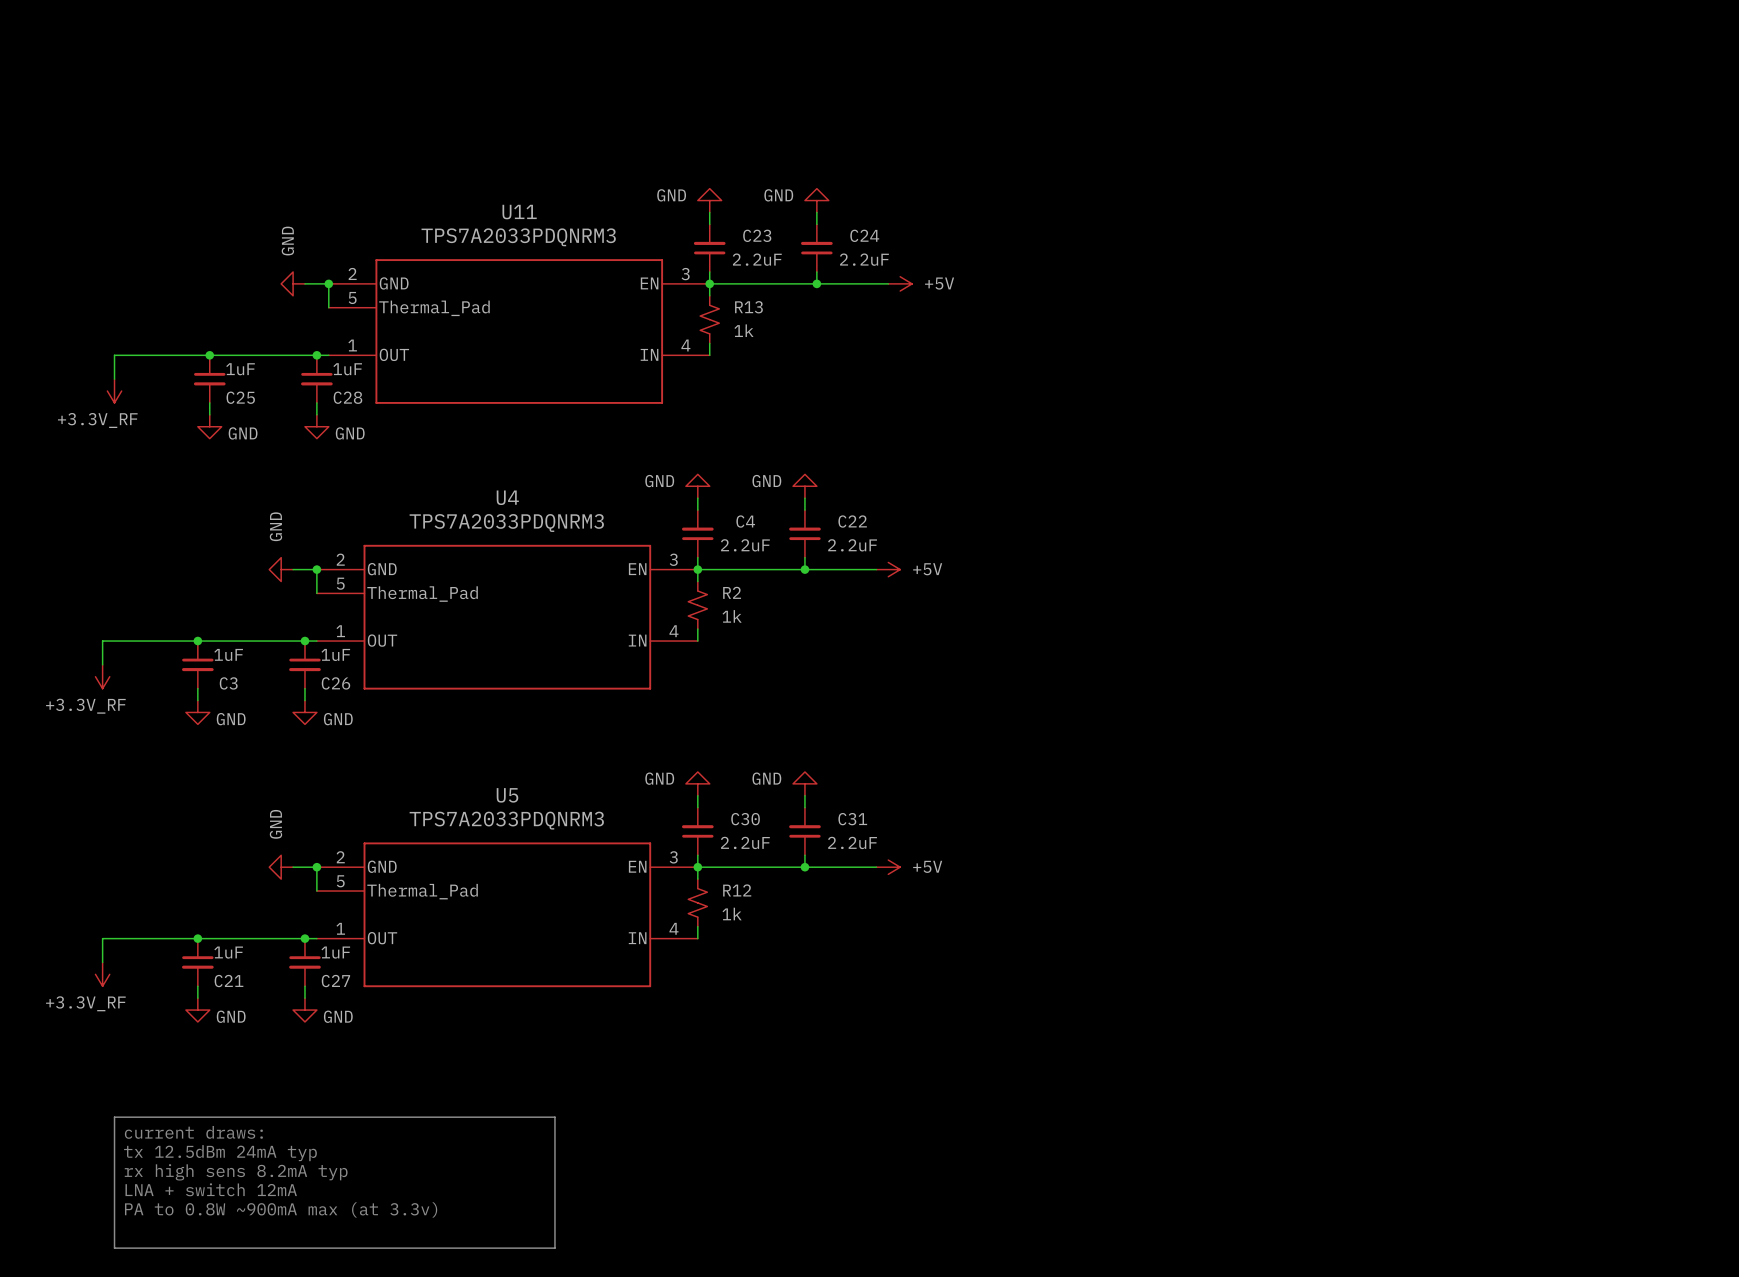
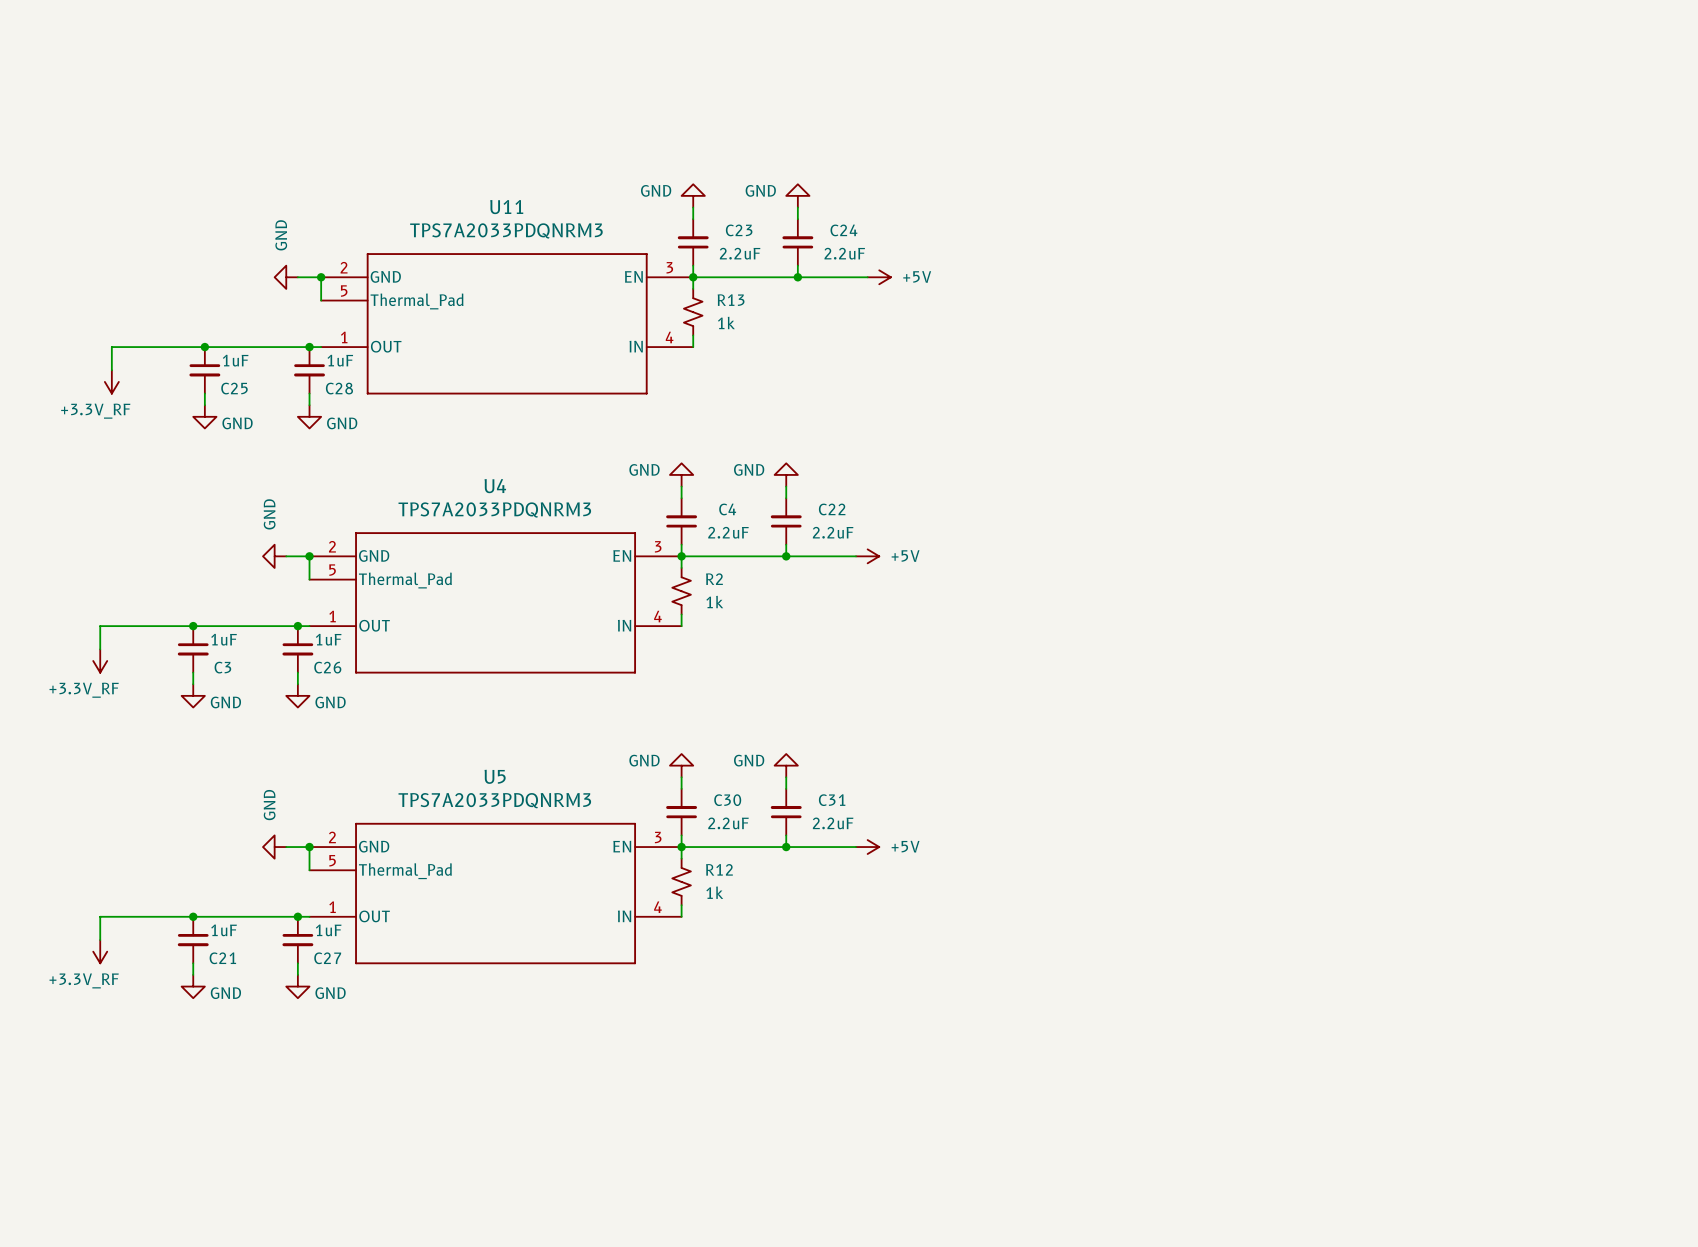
line: (114, 1117) (554, 1117) (554, 1248) (114, 1248) (114, 1117) -> none
text: current draws: (193, 1132) -> none
text: tx 12.5dBm 24mA typ (220, 1153) -> none
text: rx high sens 8.2mA typ (236, 1172) -> none
text: LNA + switch 12mA (211, 1189) -> none
text: PA to 0.8W ~900mA max (at 3.3v) (281, 1209) -> none

